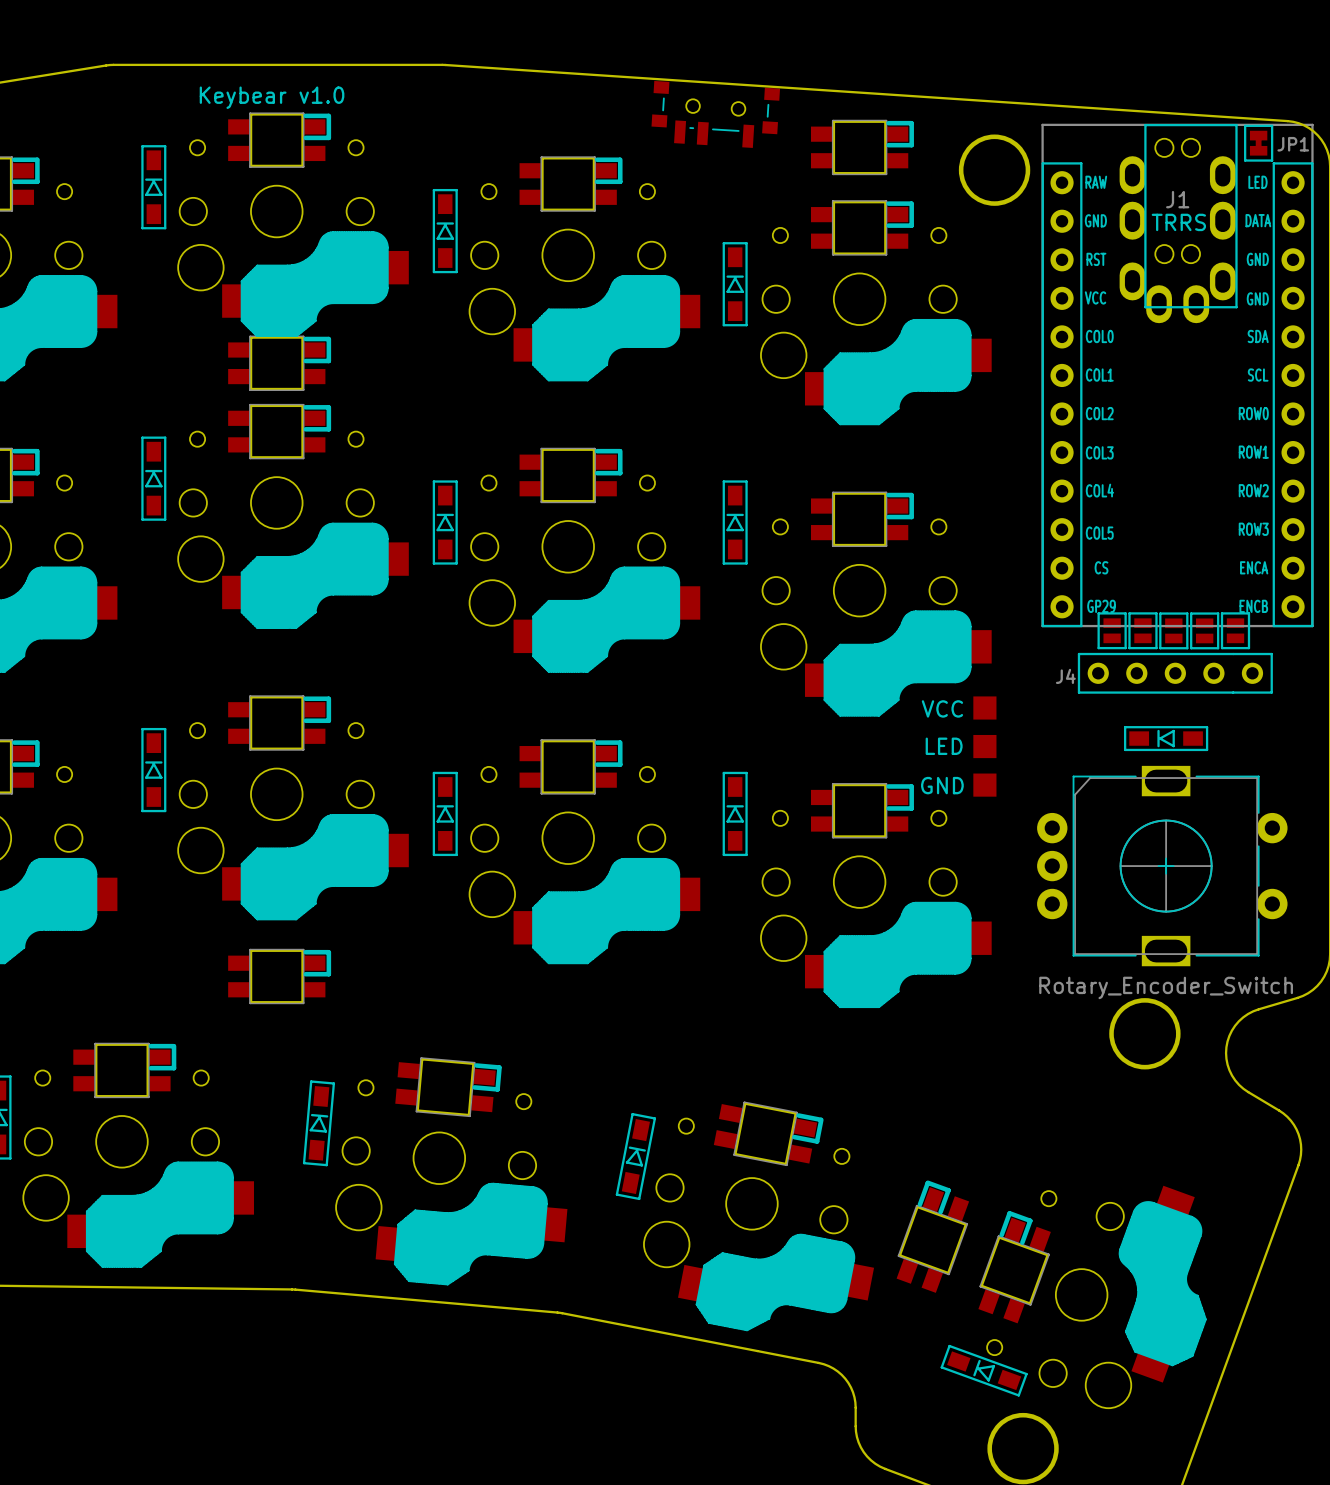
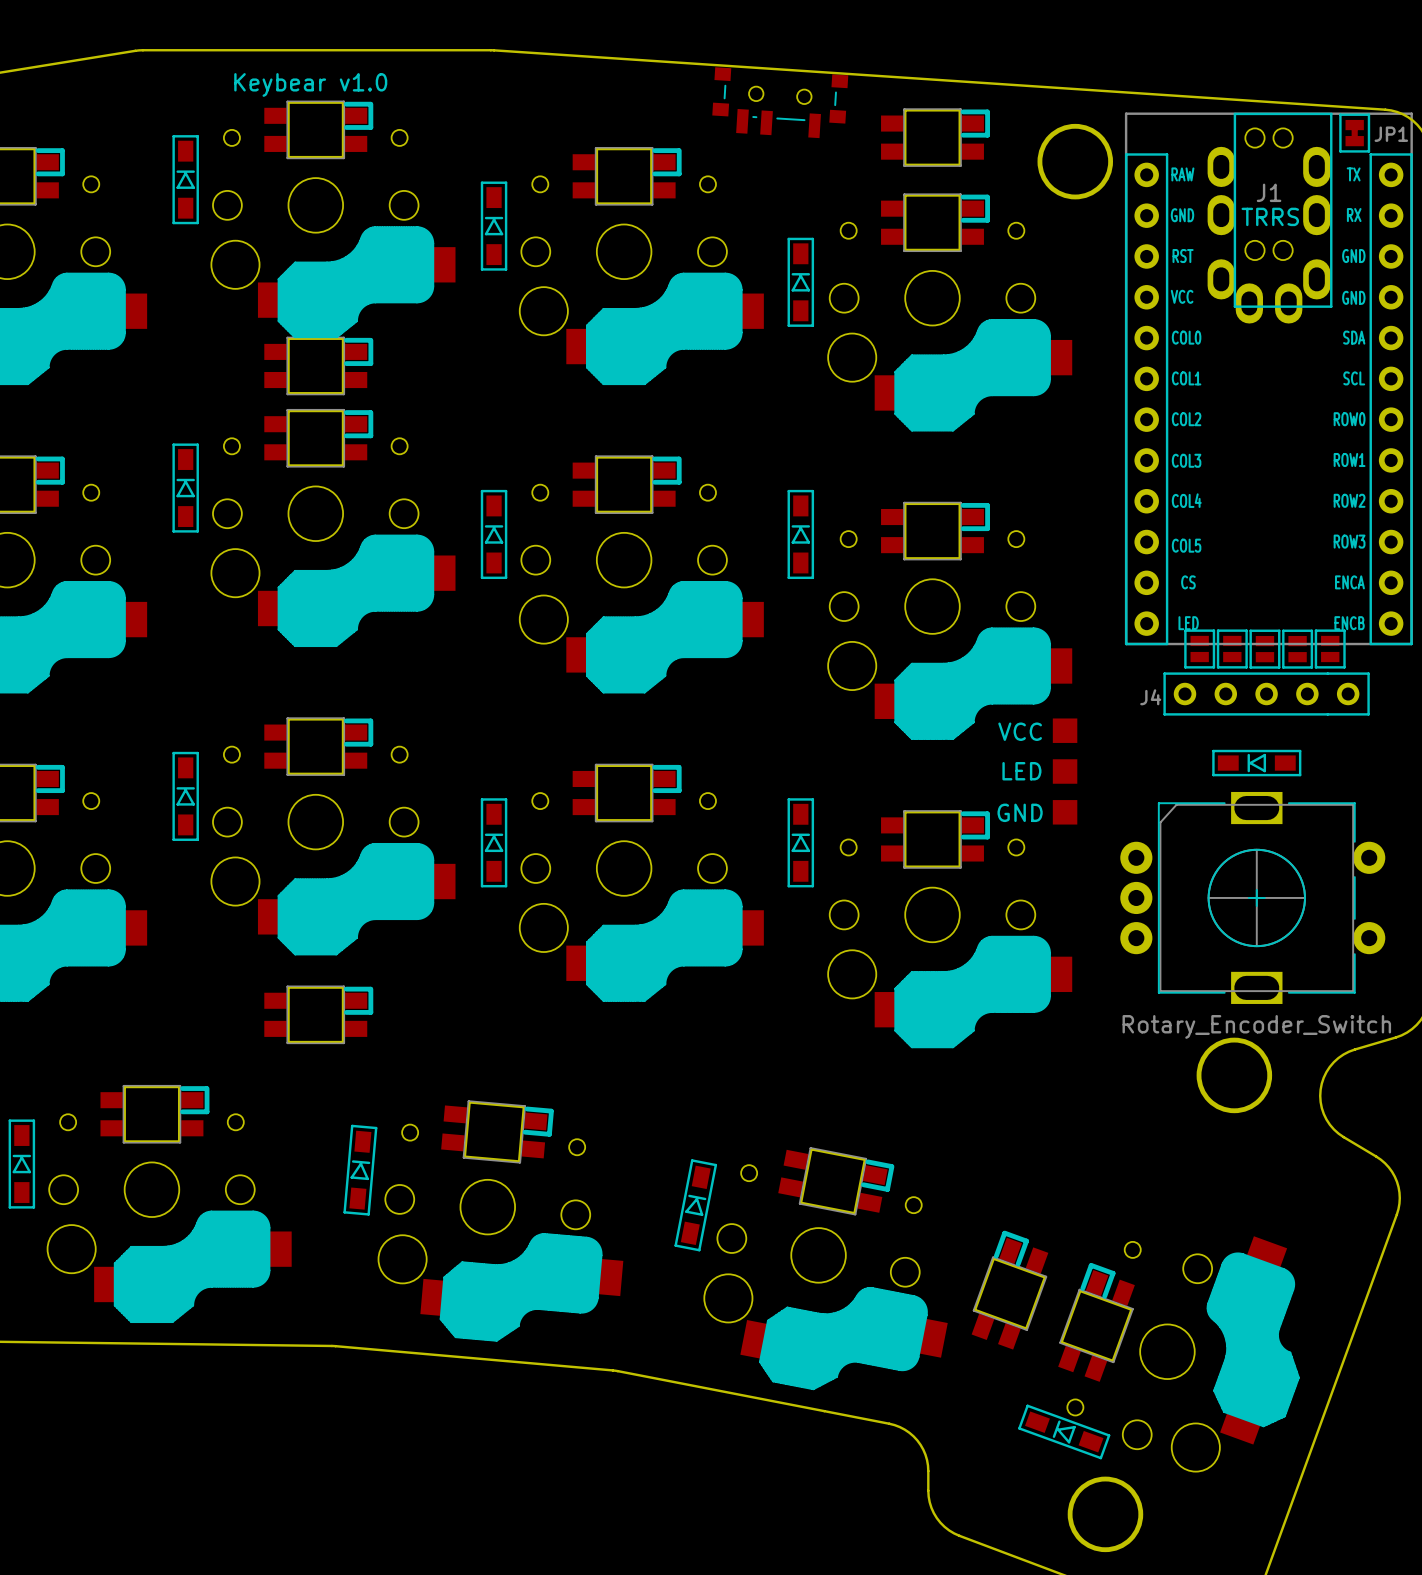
part text: LED (1257, 182) -> TX (1353, 174)
part text: DATA (1258, 220) -> RX (1354, 215)
part text: GP29 (1101, 606) -> LED (1188, 623)

